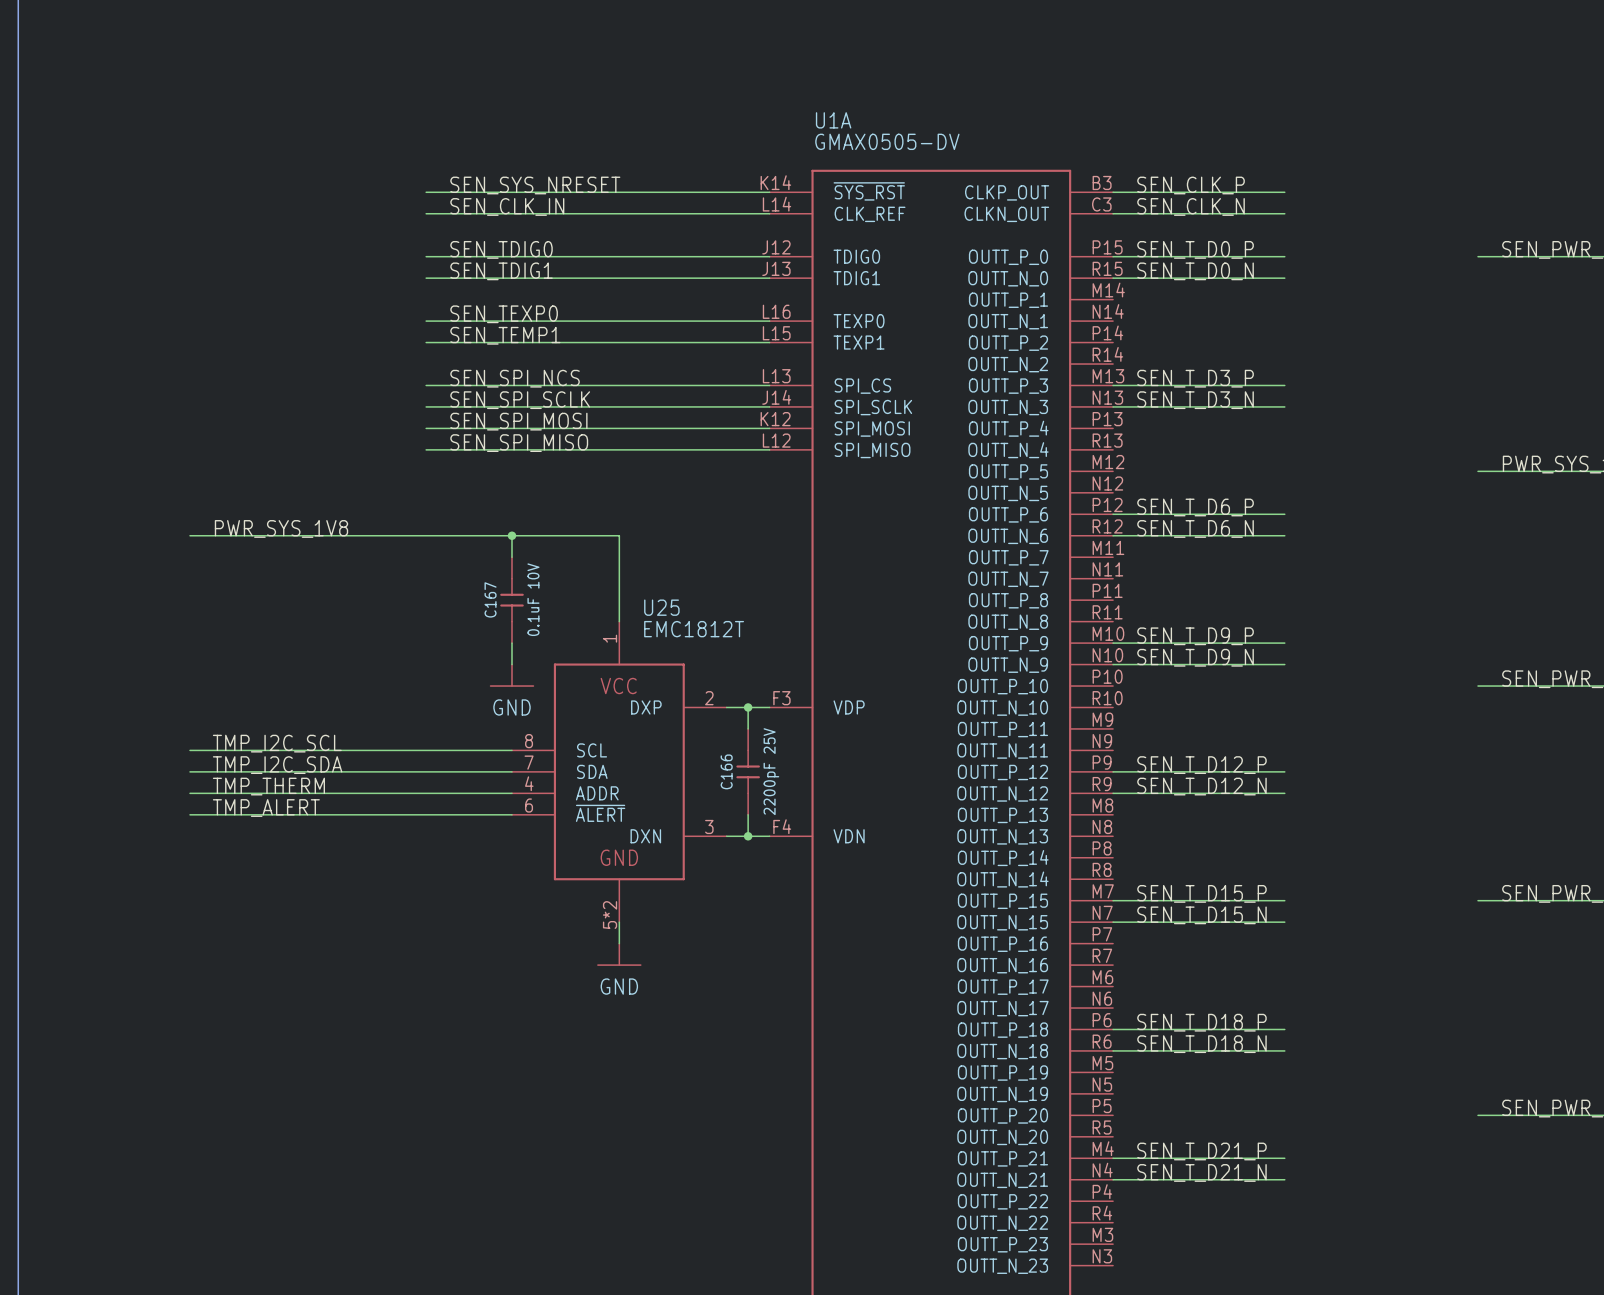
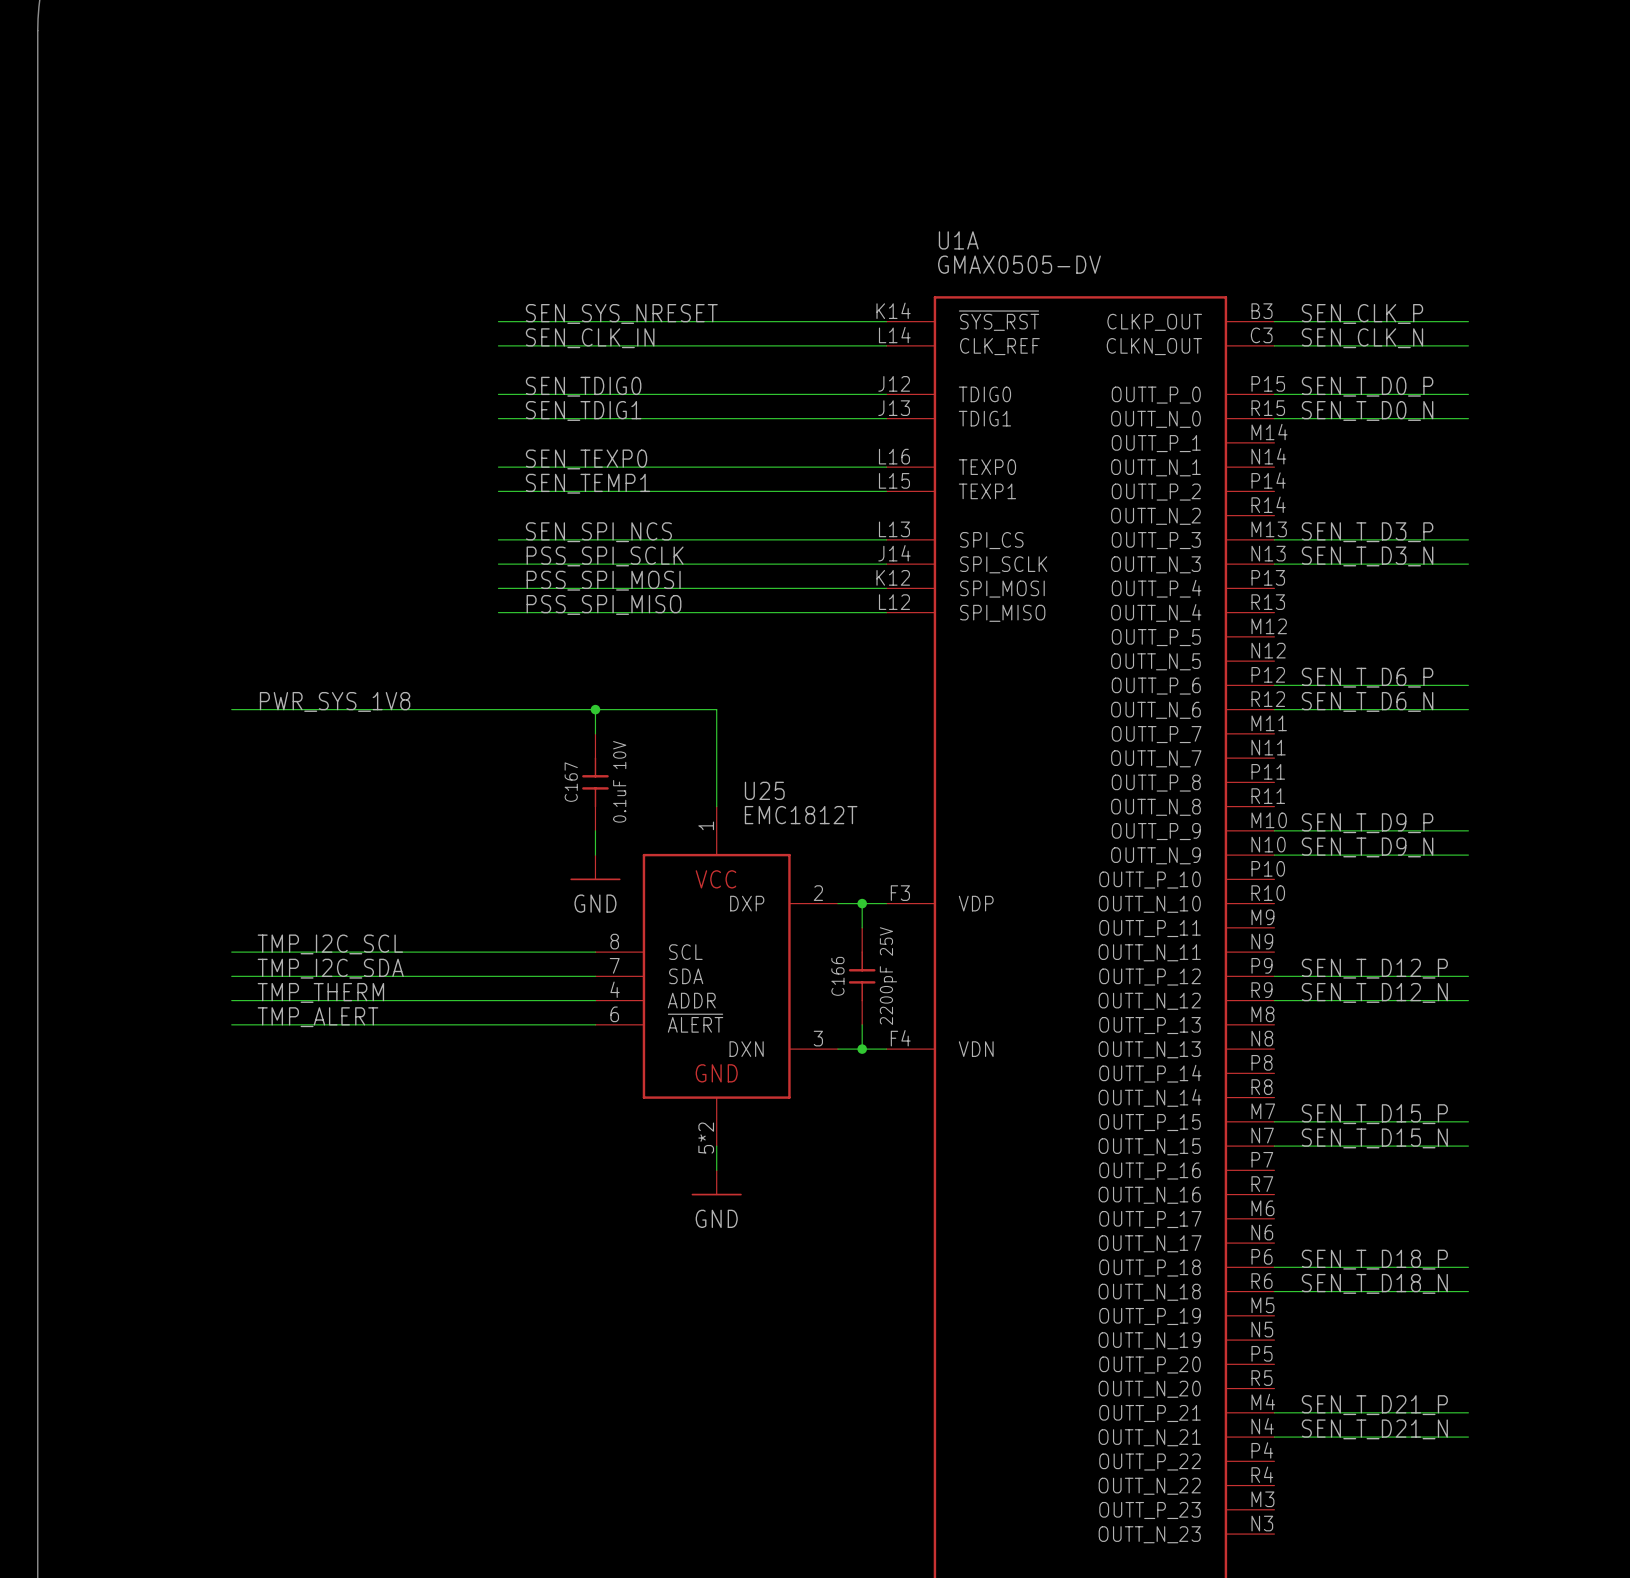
label: SEN_SPI_SCLK (520, 400) -> PSS_SPI_SCLK (605, 556)
label: SEN_SPI_MOSI (518, 421) -> PSS_SPI_MOSI (603, 580)
label: SEN_SPI_MISO (519, 443) -> PSS_SPI_MISO (603, 604)

